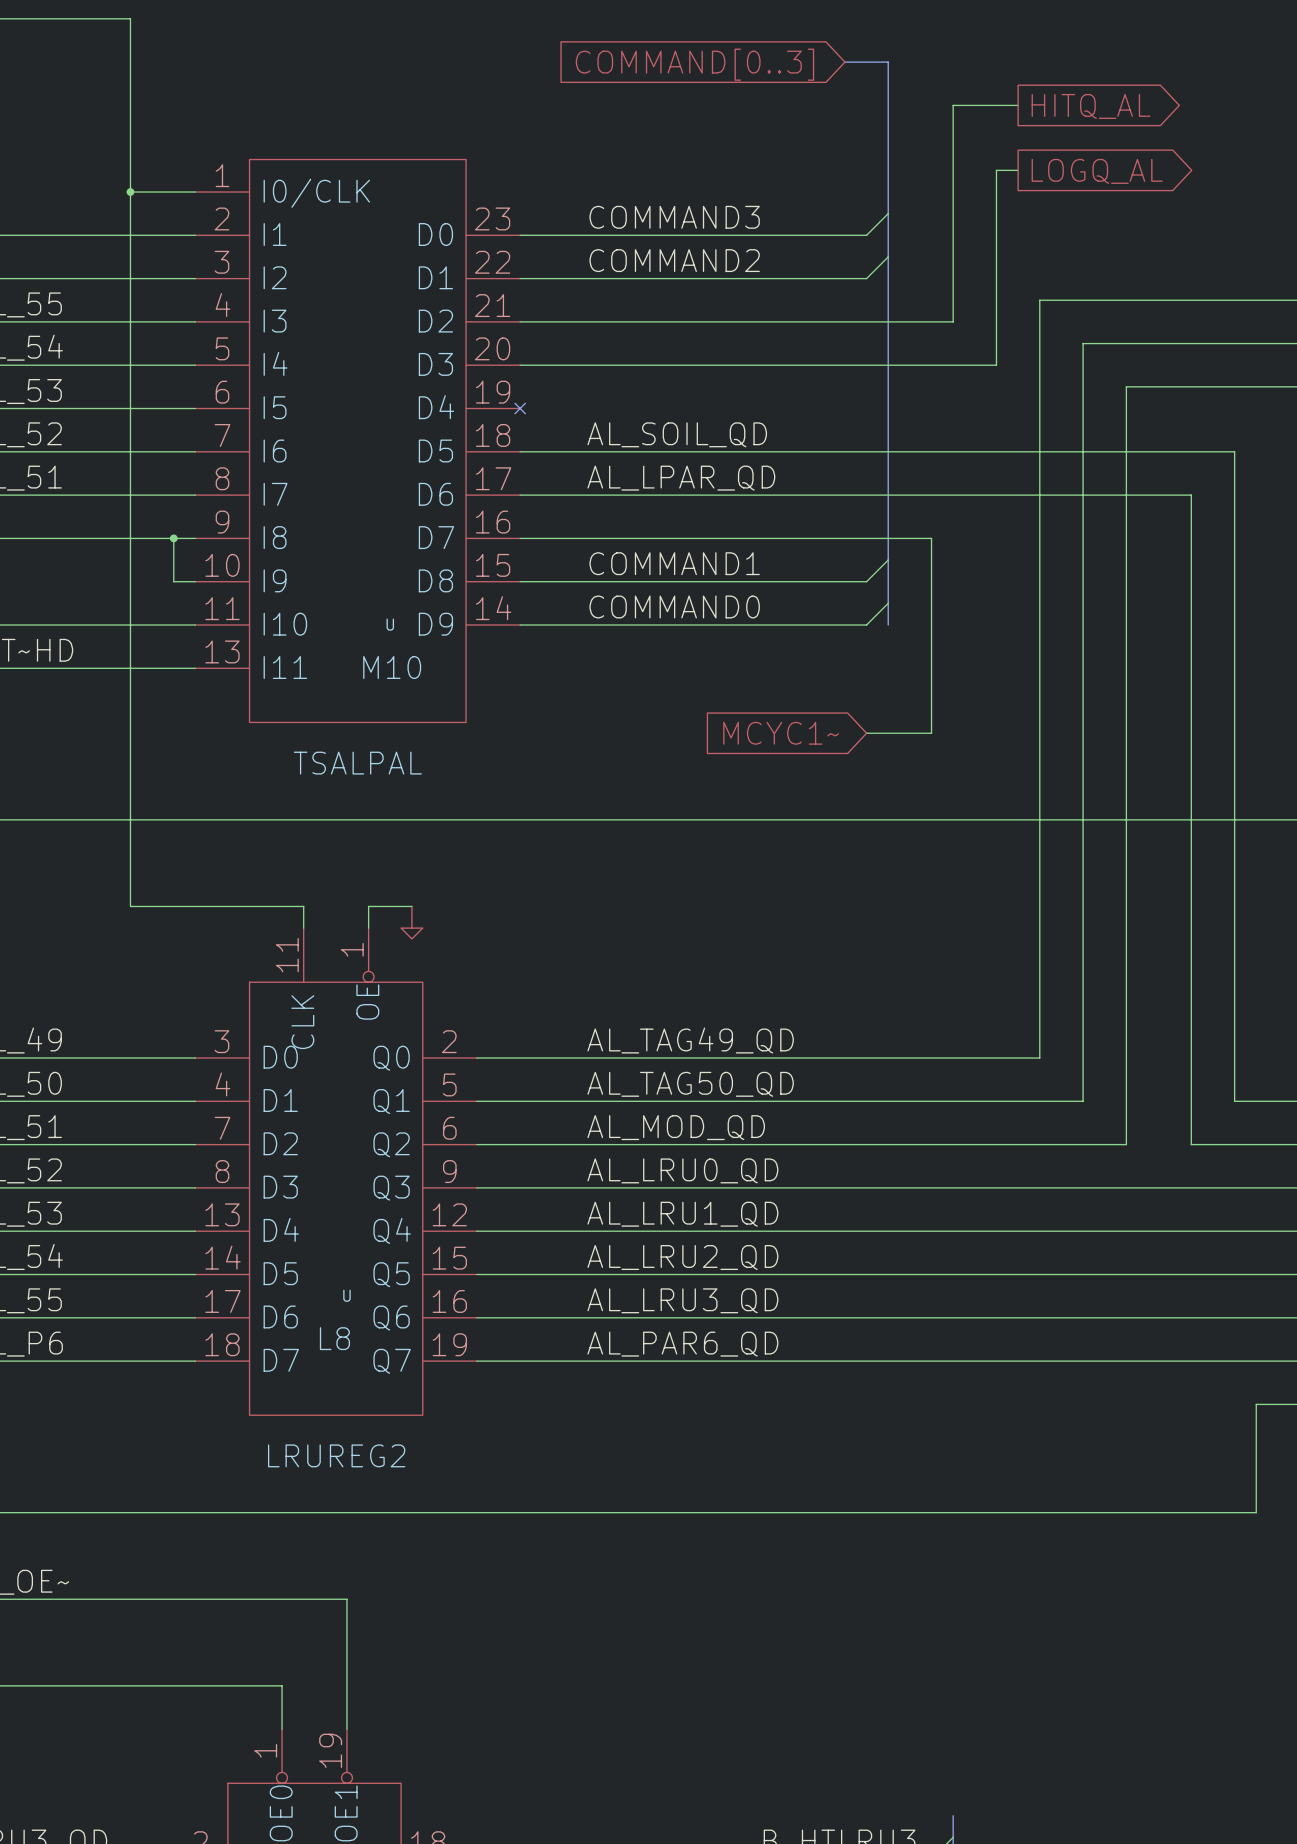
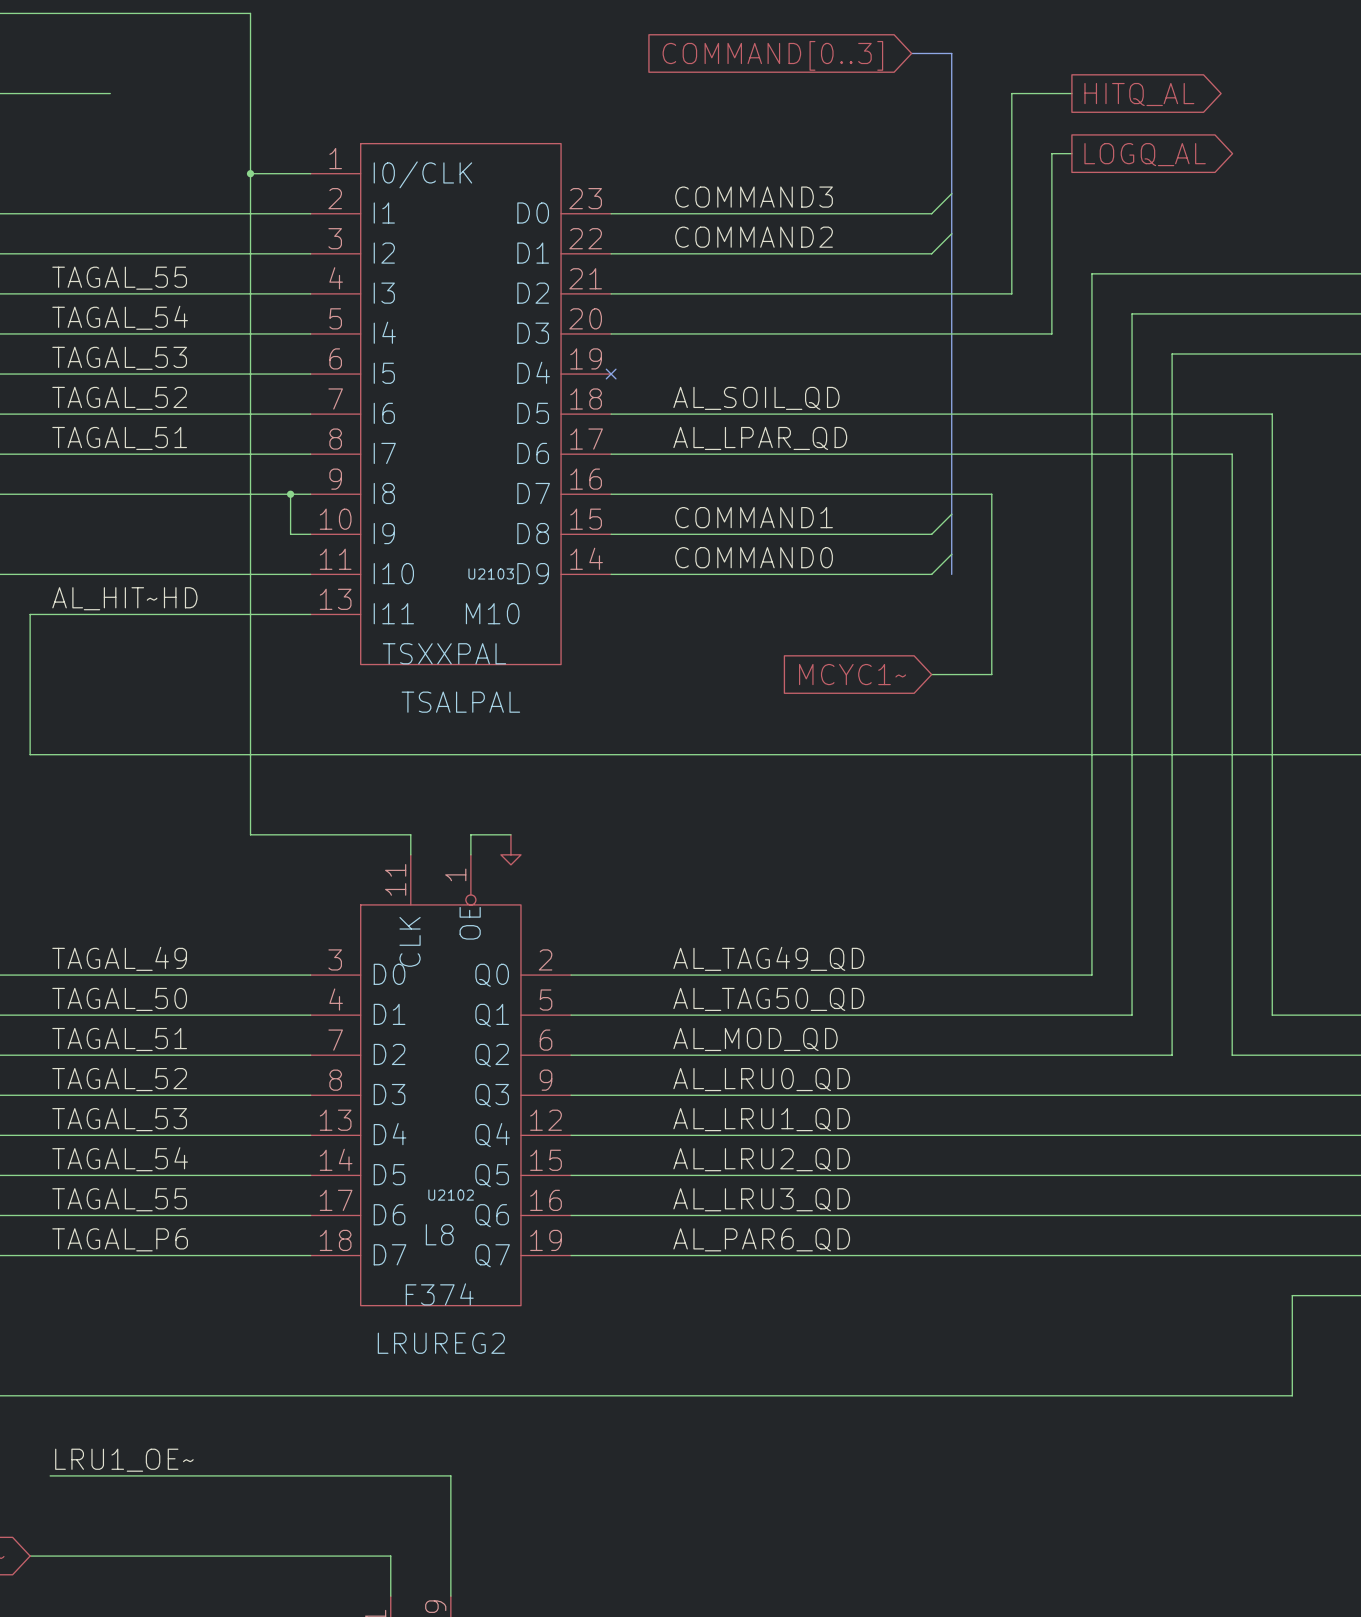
U name: U (390, 624) -> U2103 (491, 574)
U value: none -> TSXXPAL (444, 653)
U name: U (346, 1295) -> U2102 (451, 1195)
U value: none -> F374 (439, 1294)

